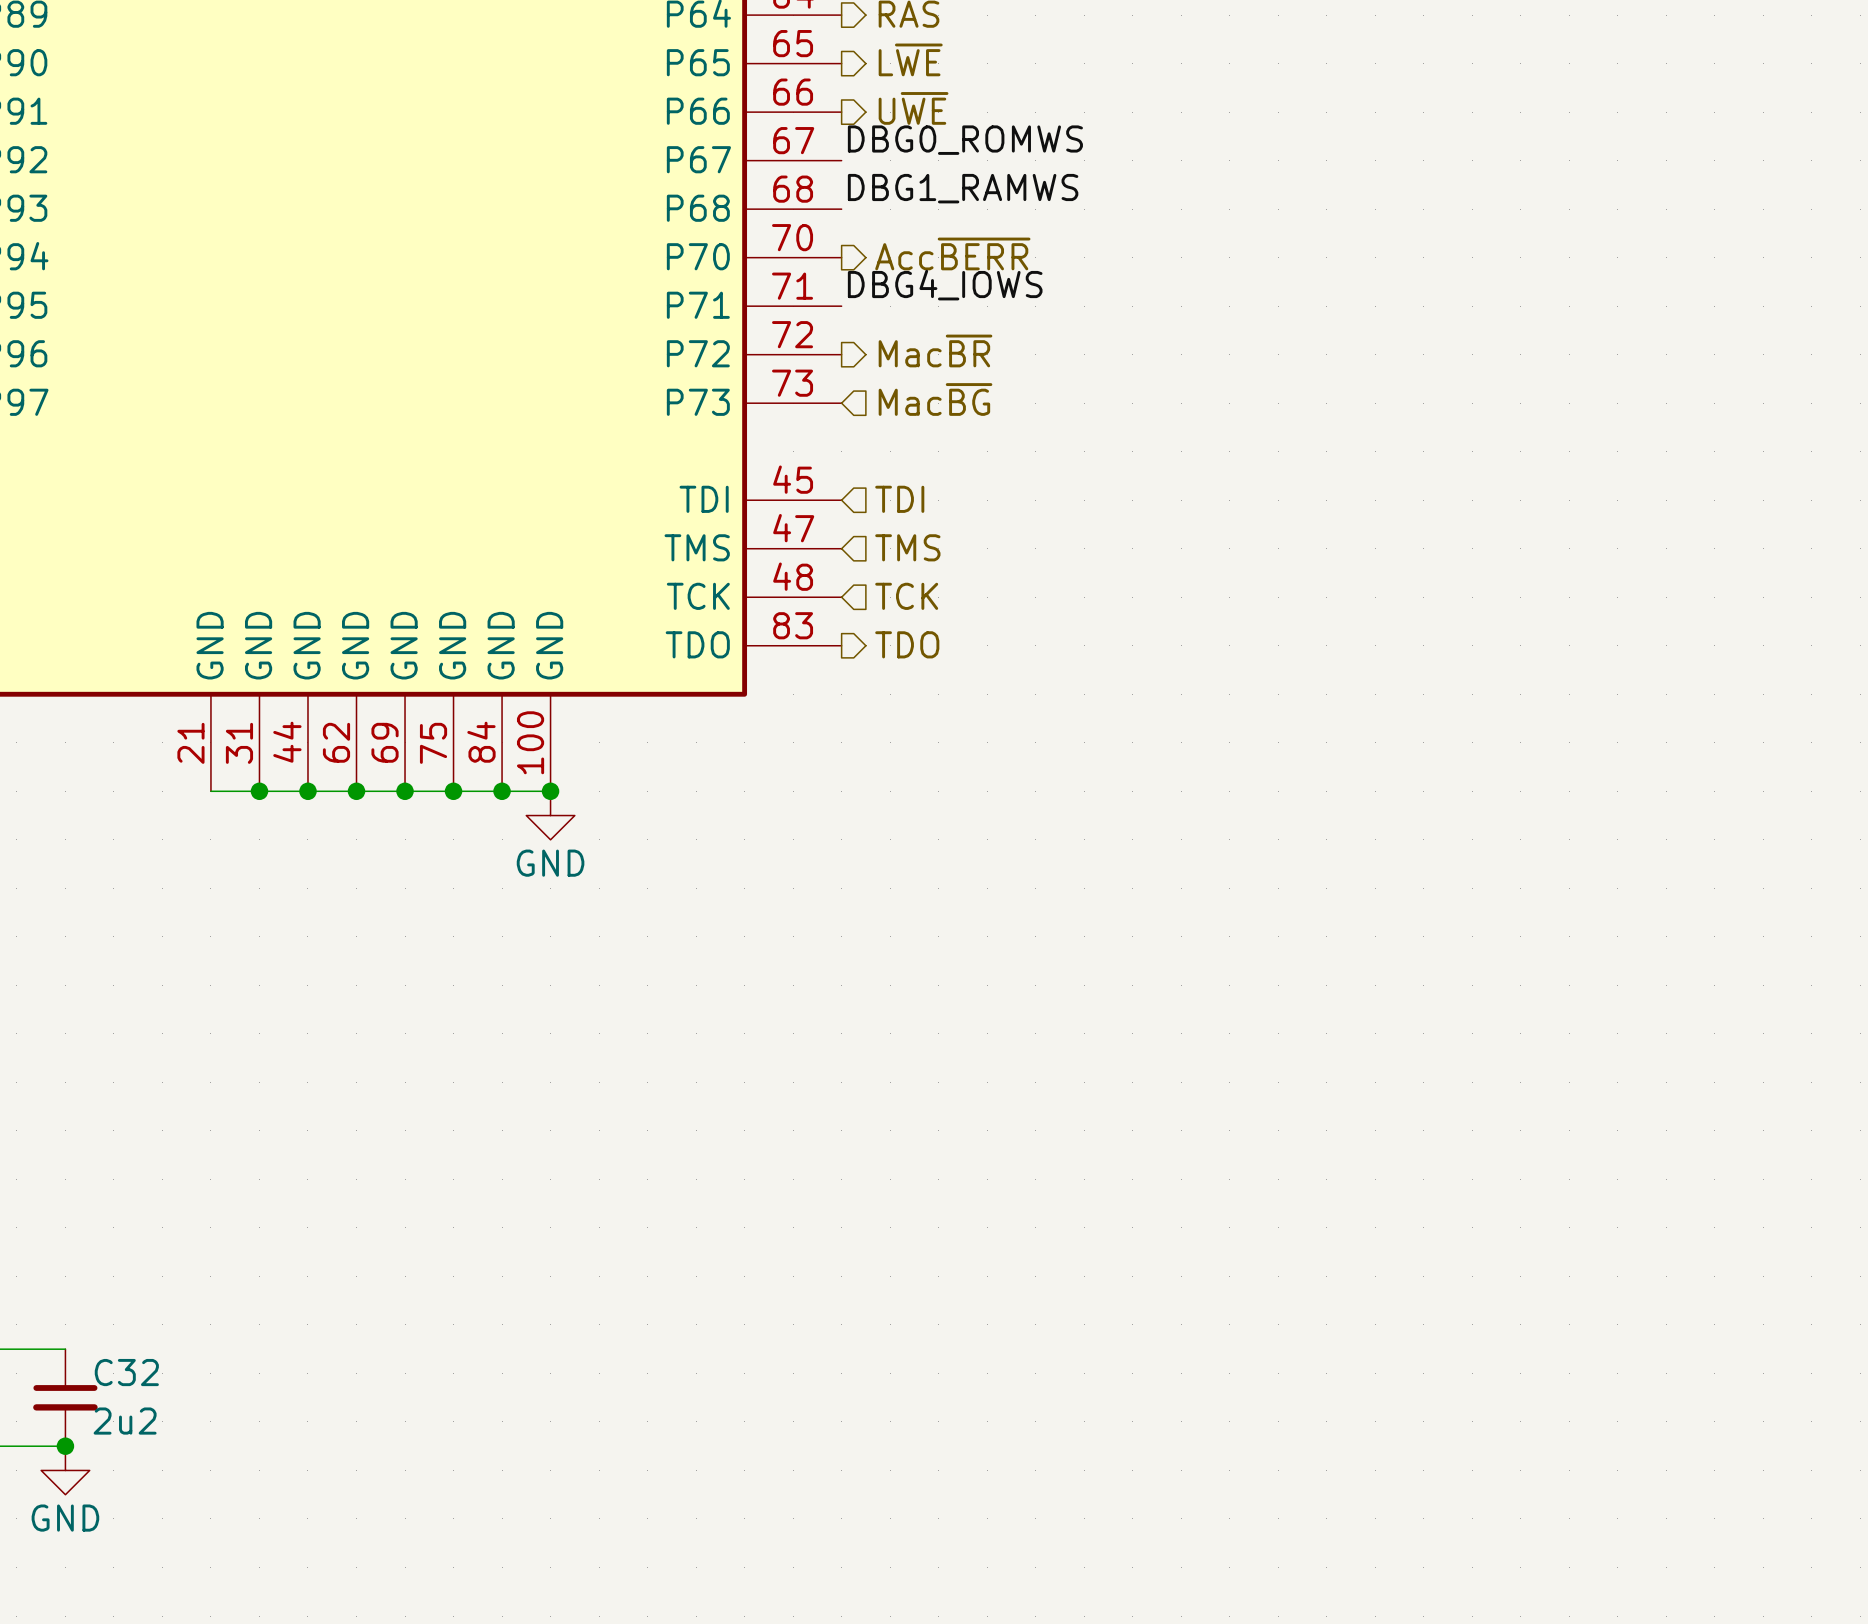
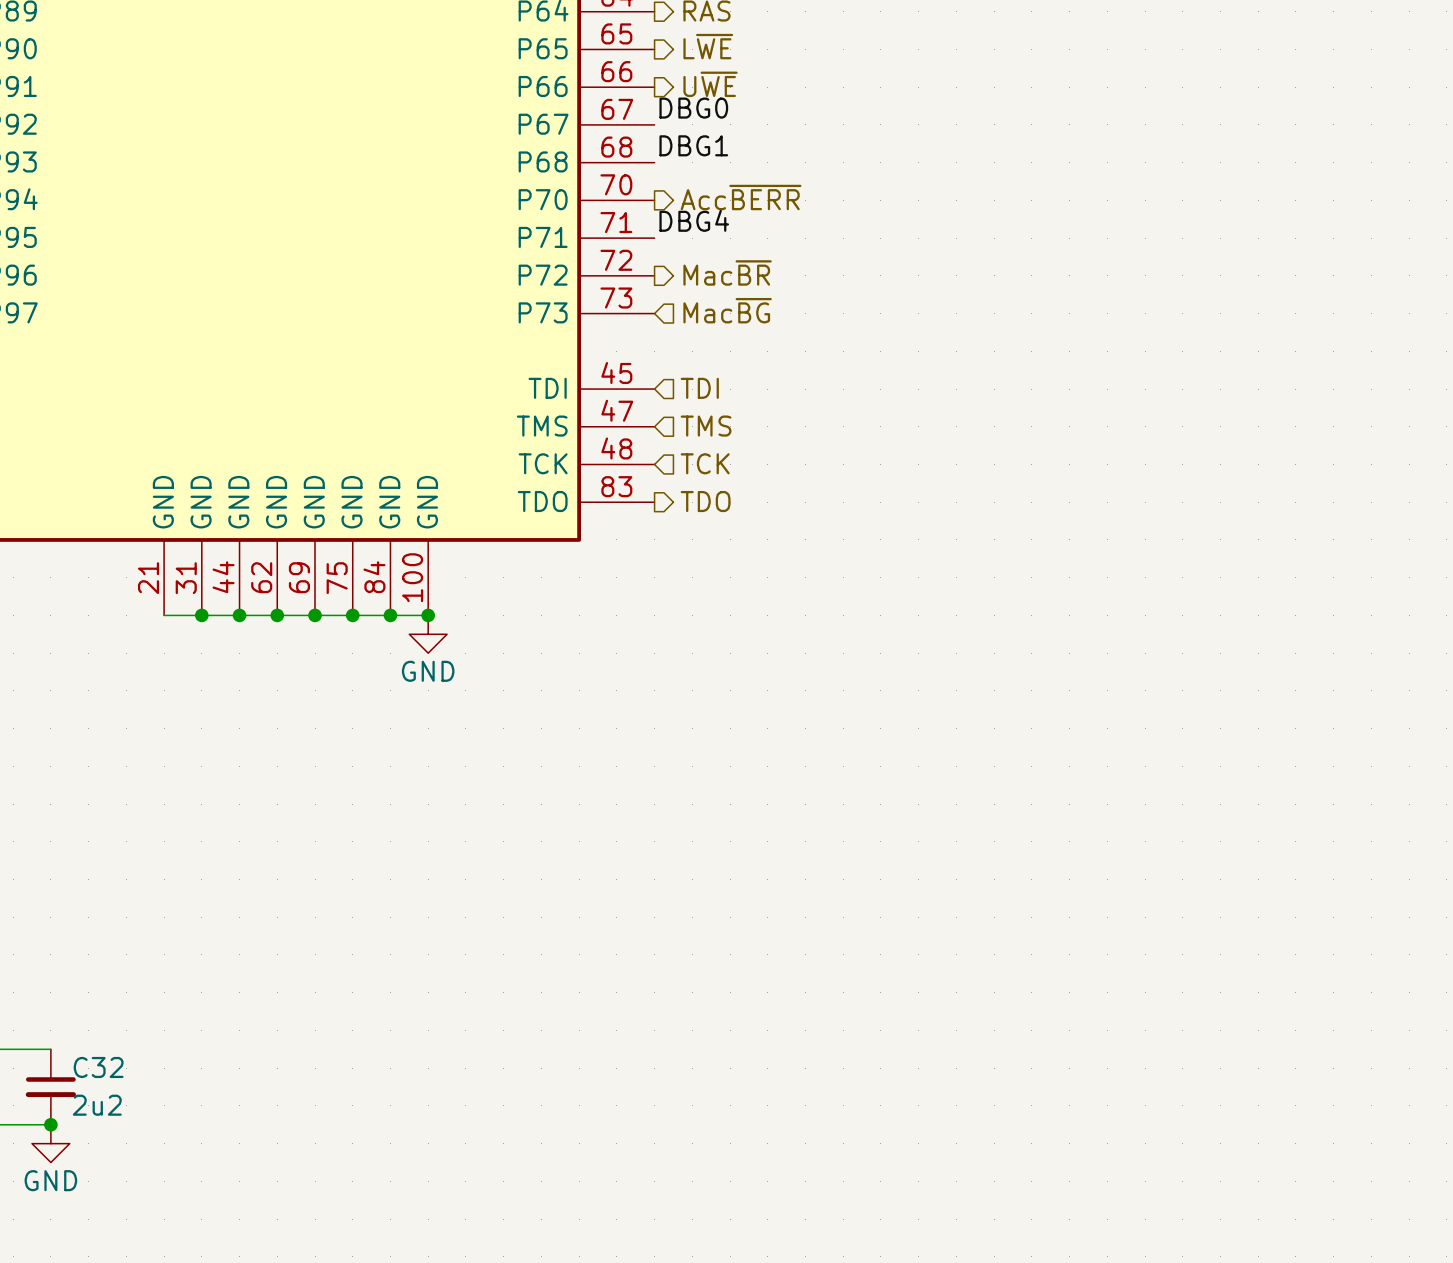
label: DBG0_ROMWS (965, 140) -> DBG0 (693, 108)
label: DBG1_RAMWS (963, 188) -> DBG1 (693, 145)
label: DBG4_IOWS (945, 285) -> DBG4 (694, 220)

